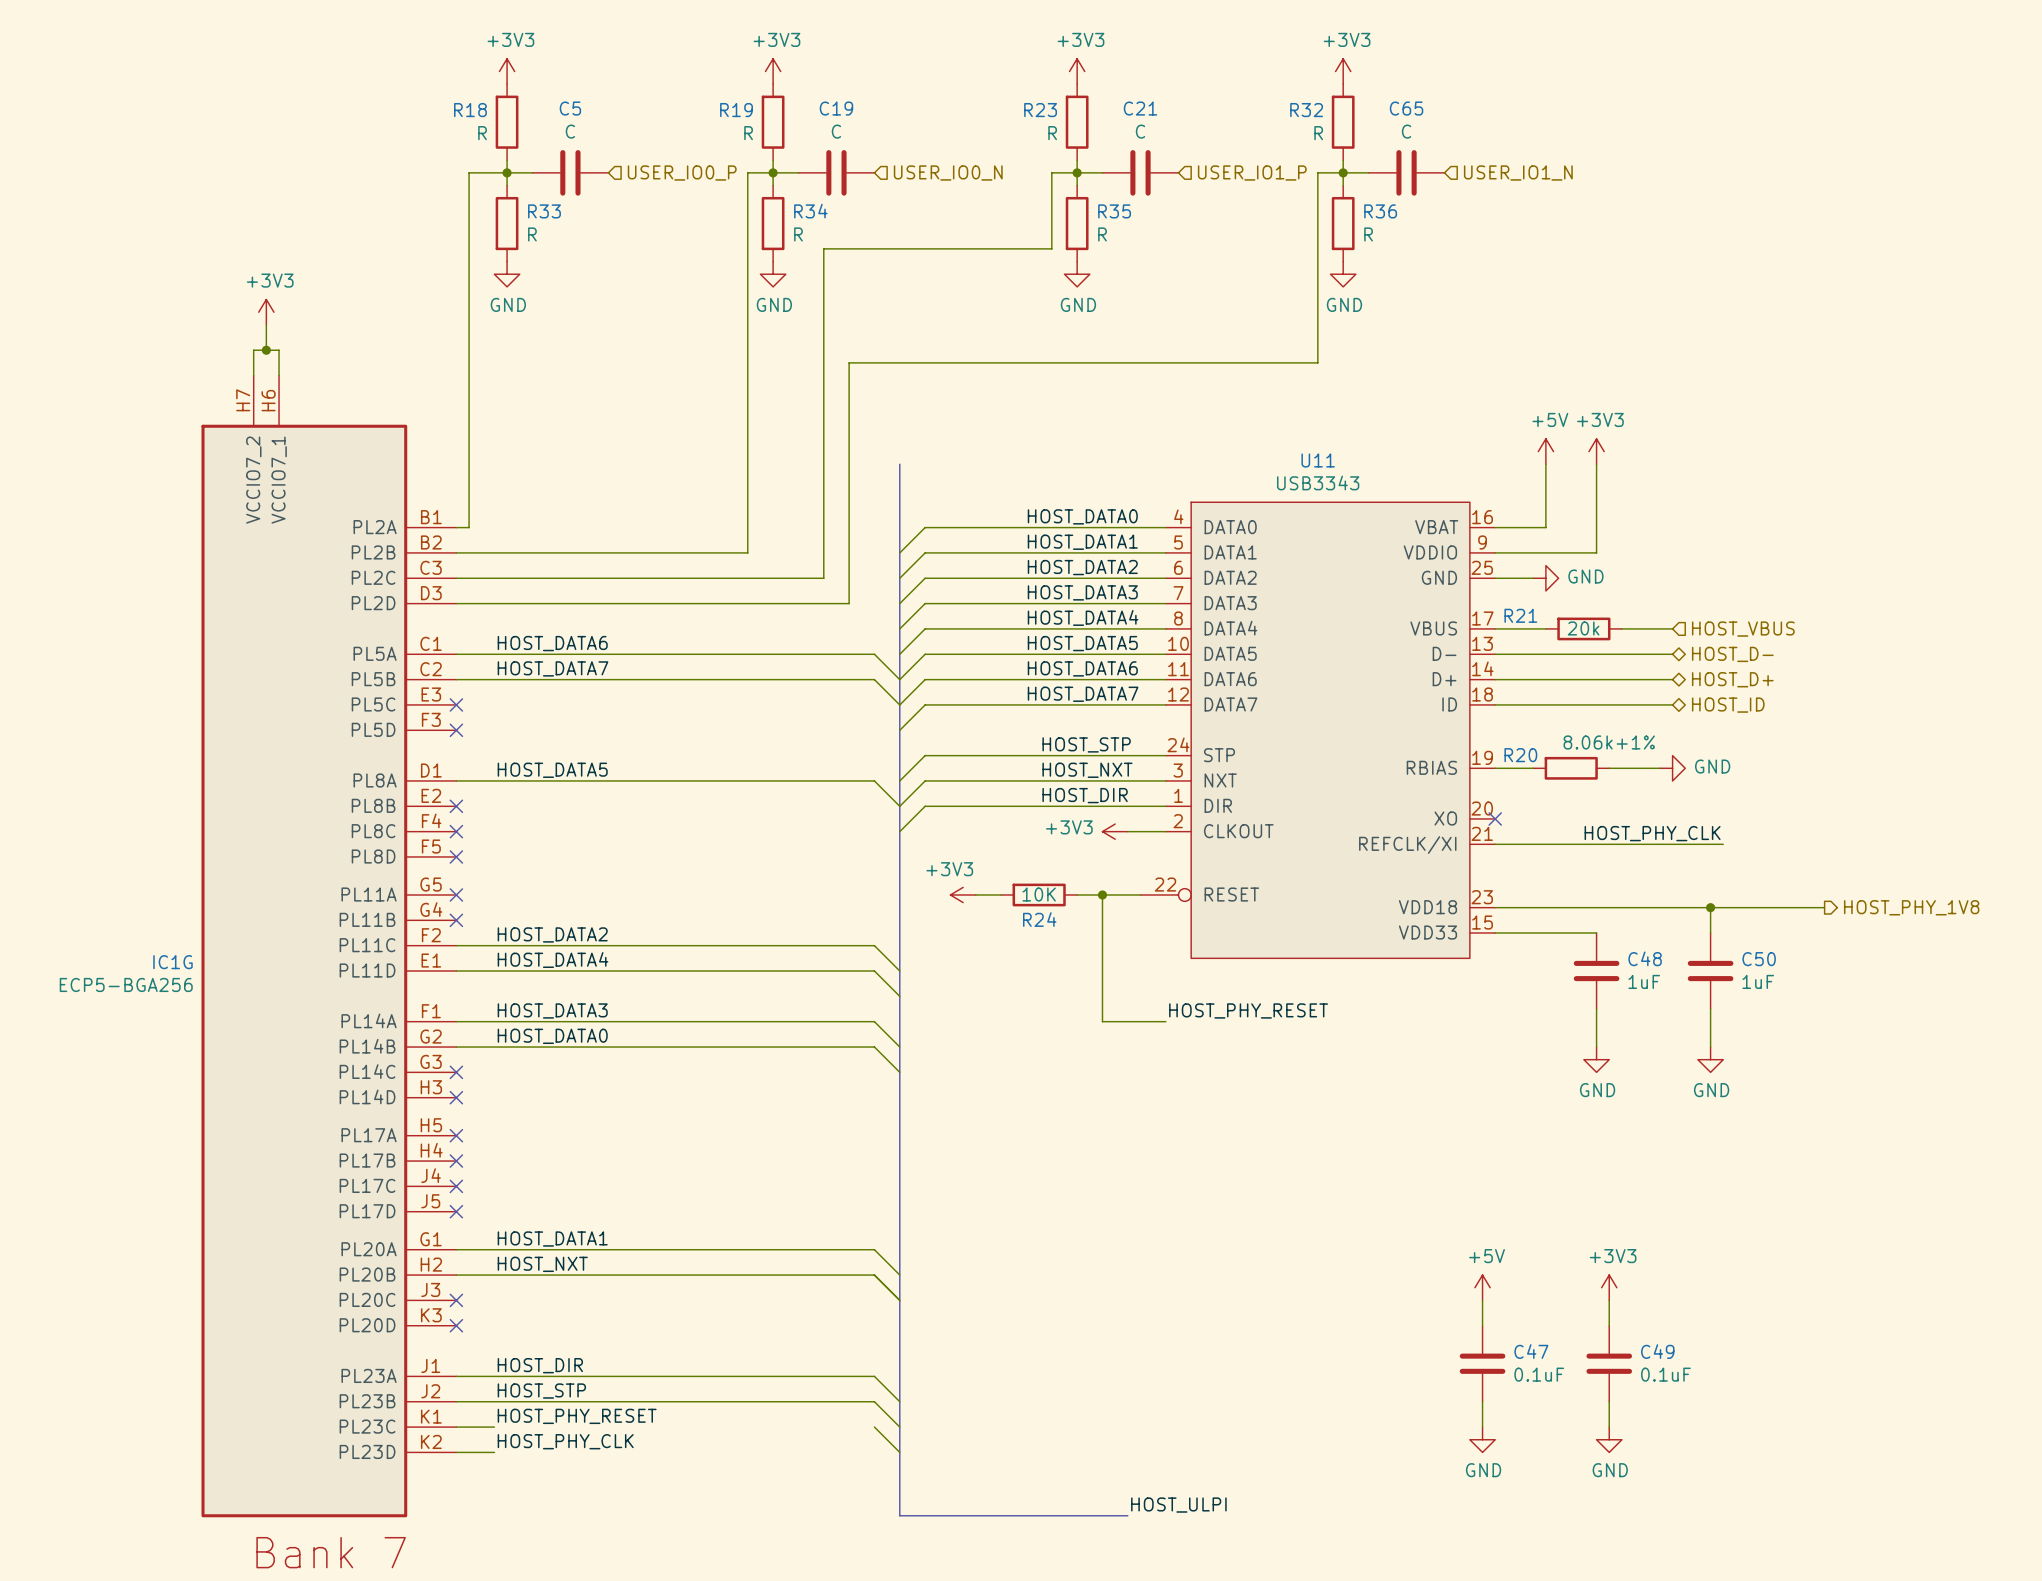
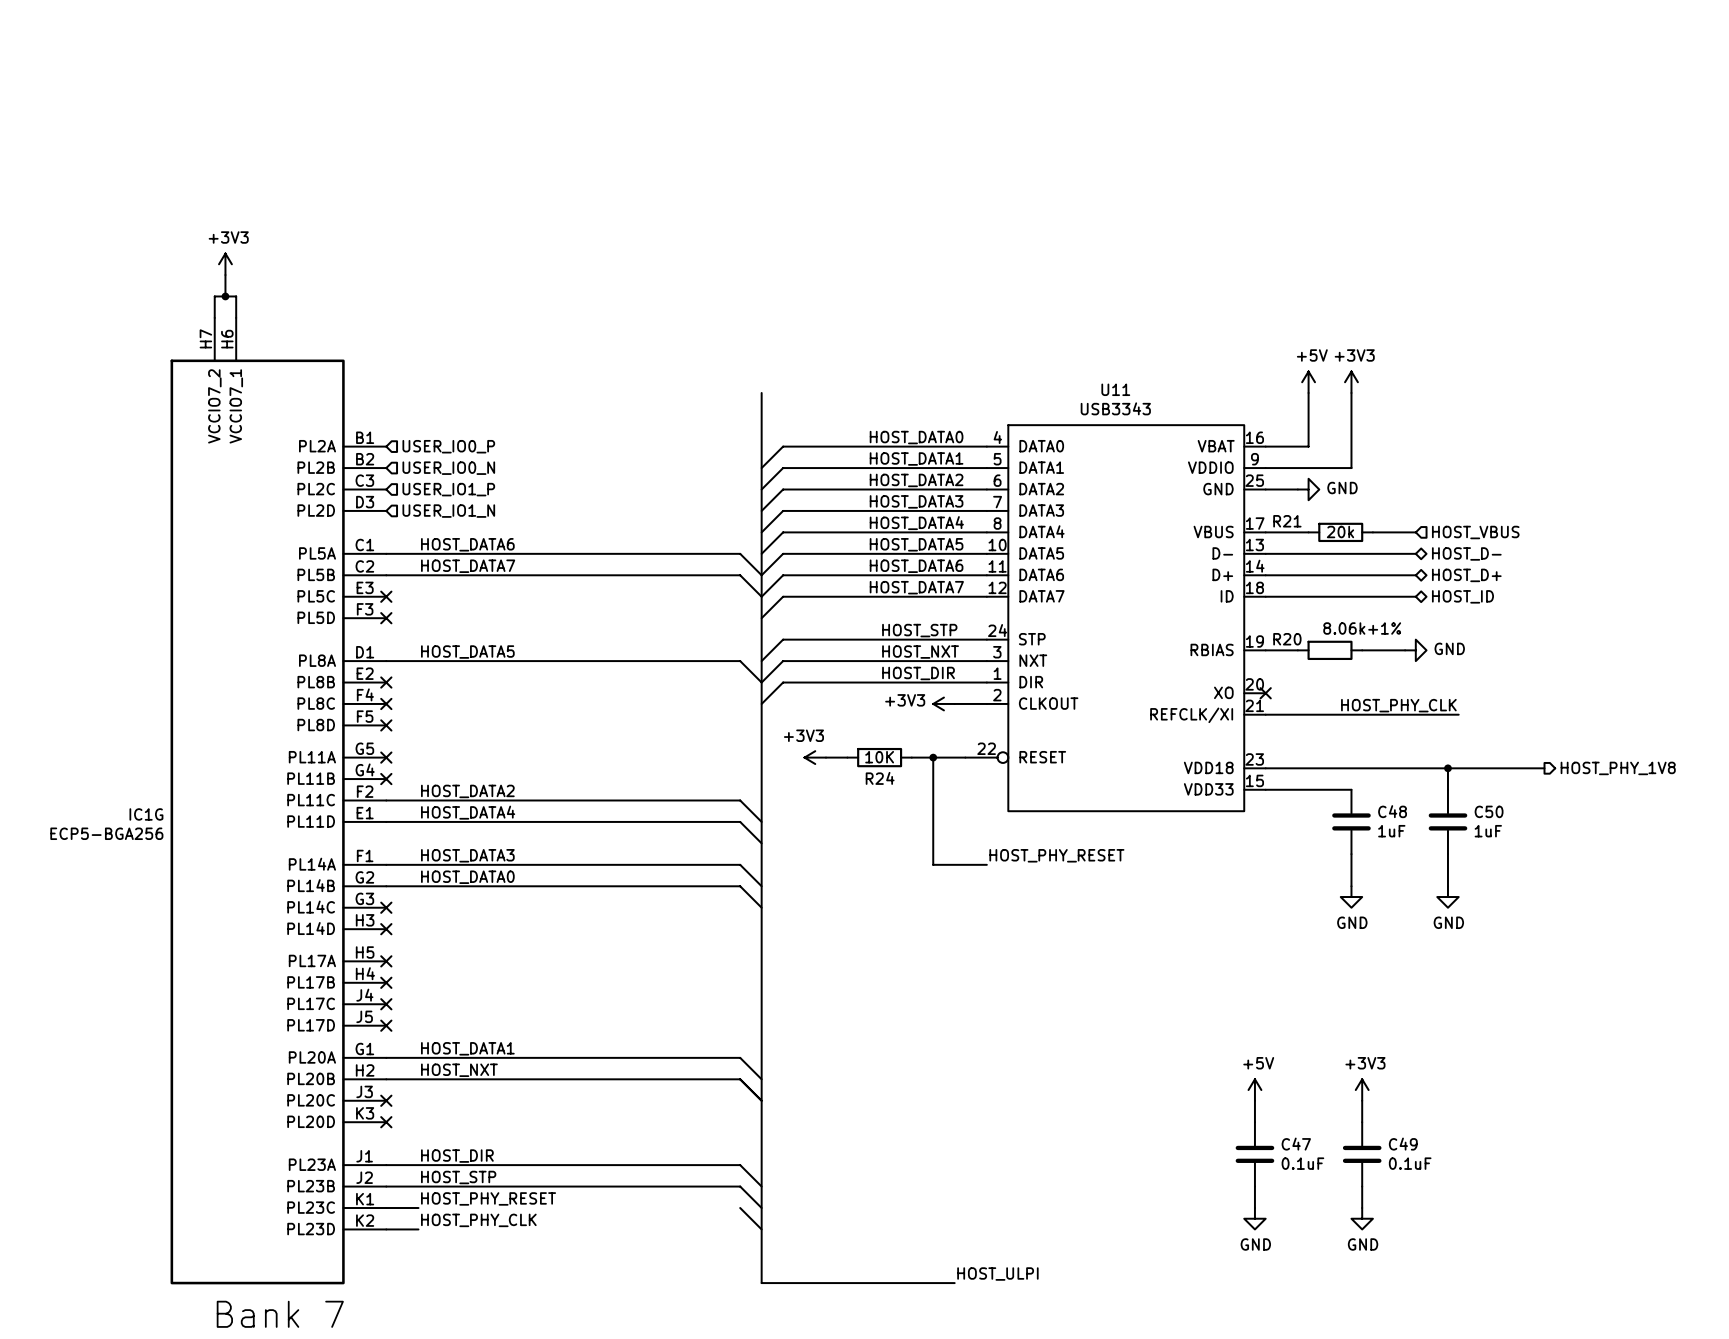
power symbol: +3V3 (507, 71) -> none
power symbol: +3V3 (773, 71) -> none
power symbol: +3V3 (1077, 71) -> none
power symbol: +3V3 (1343, 71) -> none
R18: R (507, 122) -> none
R19: R (773, 122) -> none
R23: R (1077, 122) -> none
R32: R (1343, 122) -> none
wire: (507, 160) (507, 185) -> none
wire: (773, 160) (773, 185) -> none
wire: (1077, 160) (1077, 185) -> none
wire: (1343, 160) (1343, 185) -> none
junction: (507, 172) -> none
wire: (532, 172) (469, 172) (469, 527) (456, 527) -> none
C5: C (570, 172) -> none
junction: (773, 172) -> none
wire: (798, 172) (747, 172) (747, 552) (456, 552) -> none
C19: C (836, 172) -> none
junction: (1077, 172) -> none
wire: (1102, 172) (1051, 172) (1051, 248) (823, 248) (823, 578) (456, 578) -> none
C21: C (1140, 172) -> none
junction: (1343, 172) -> none
wire: (1368, 172) (1317, 172) (1317, 362) (849, 362) (849, 603) (456, 603) -> none
C65: C (1406, 172) -> none
hierarchical label: USER_IO0_P (682, 173) -> none
hierarchical label: USER_IO0_N (948, 173) -> none
hierarchical label: USER_IO1_P (1252, 173) -> none
hierarchical label: USER_IO1_N (1518, 173) -> none
R33: R (507, 223) -> none
R34: R (773, 223) -> none
R35: R (1077, 223) -> none
R36: R (1343, 223) -> none
power symbol: GND (507, 274) -> none
power symbol: GND (773, 274) -> none
power symbol: GND (1077, 274) -> none
power symbol: GND (1343, 274) -> none
hierarchical label: none -> USER_IO0_P (448, 446)
hierarchical label: none -> USER_IO0_N (448, 468)
hierarchical label: none -> USER_IO1_P (448, 489)
hierarchical label: none -> USER_IO1_N (448, 511)

